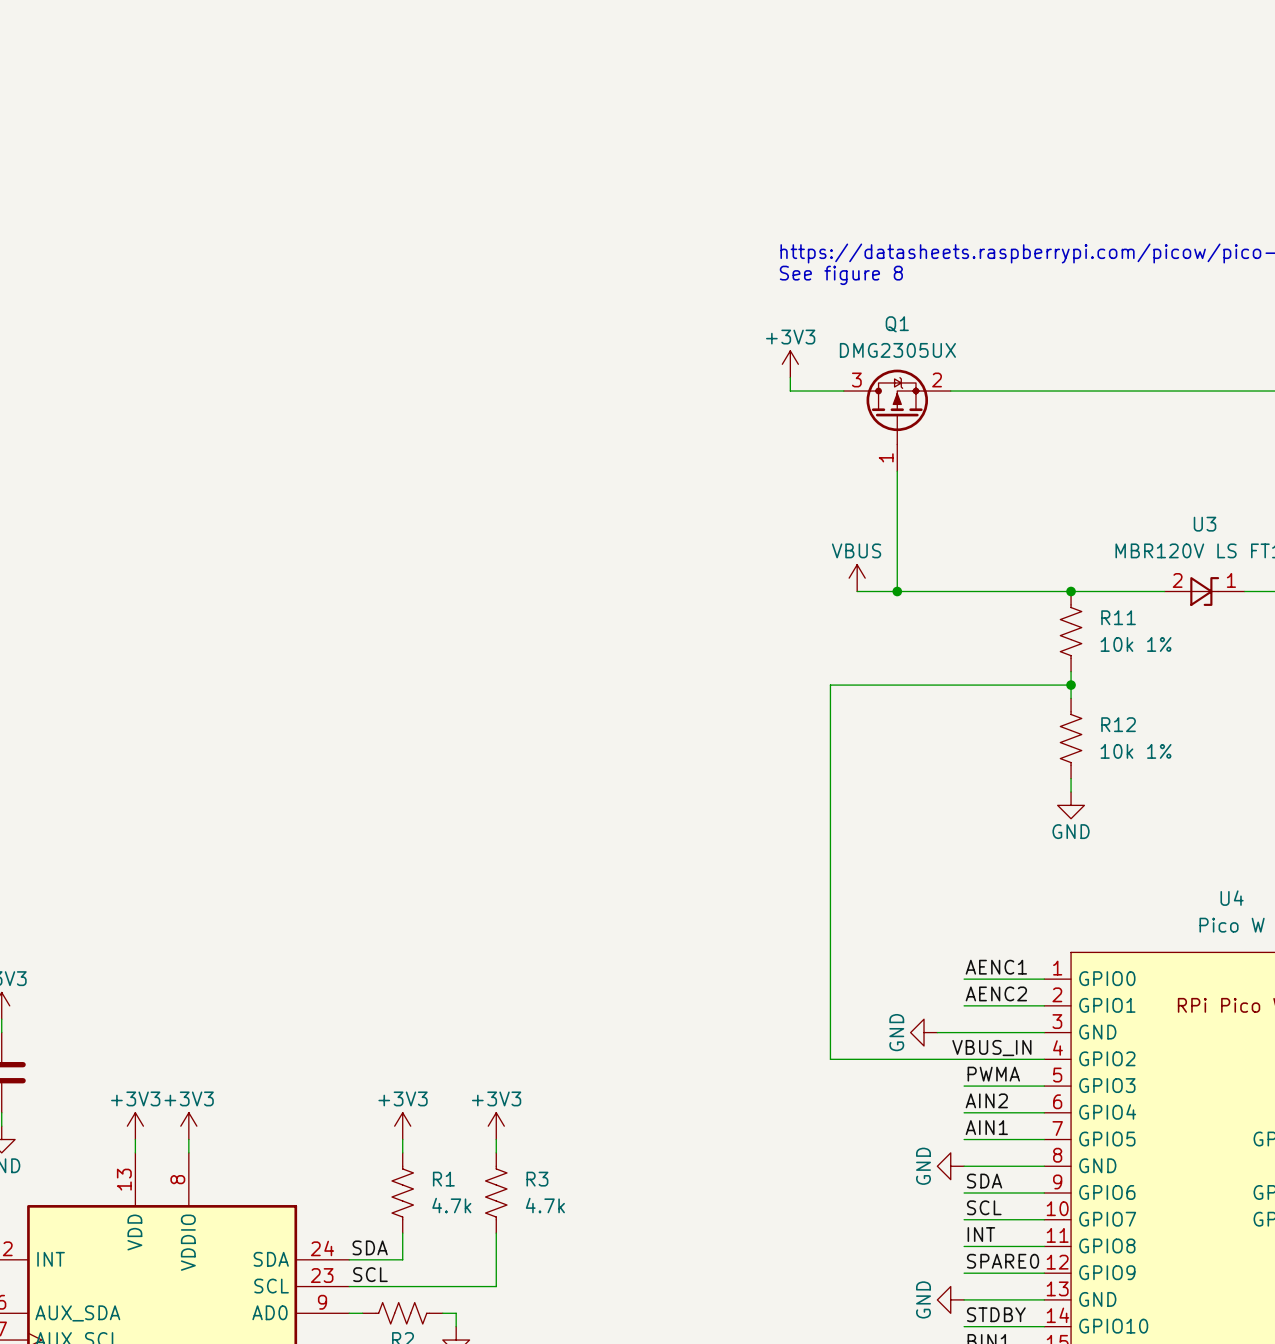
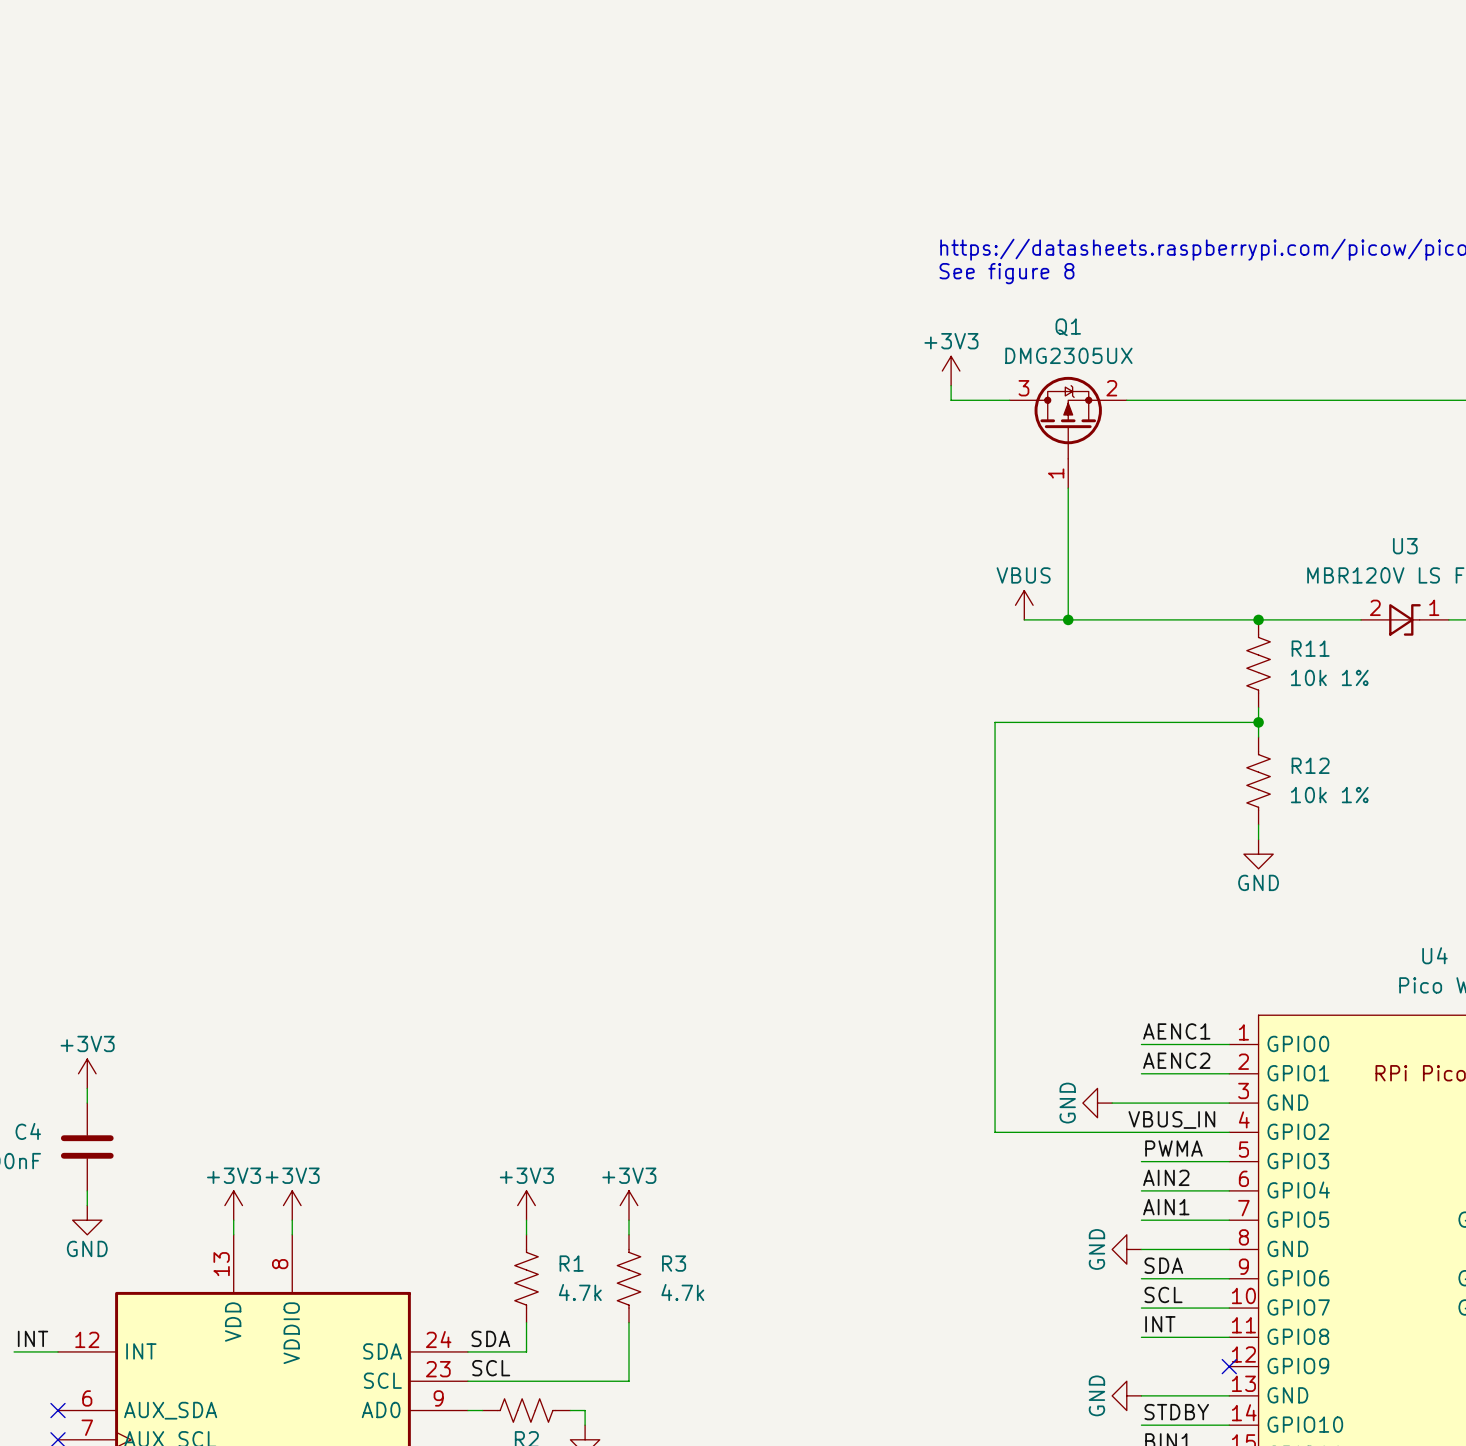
label: SPARE0 (1003, 1261) -> none
wire: (964, 1273) (1044, 1273) -> none
no-connect mark: none -> (1229, 1366)

